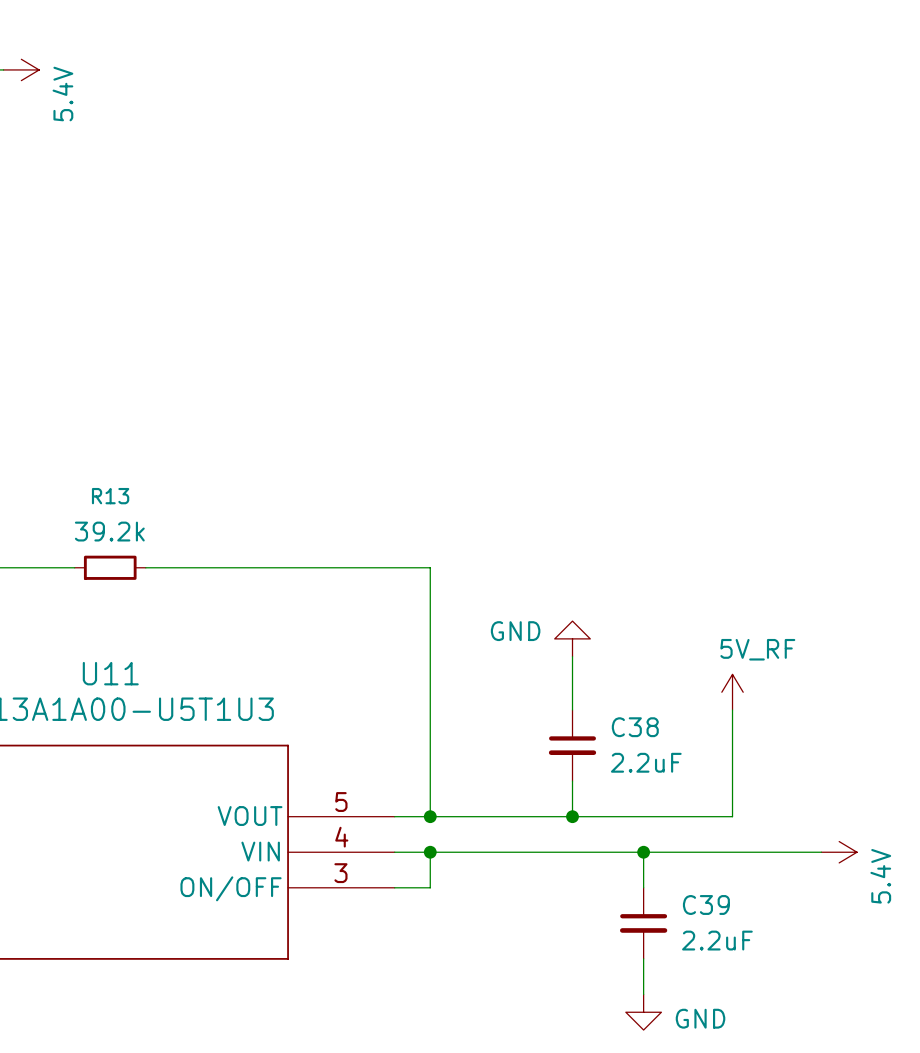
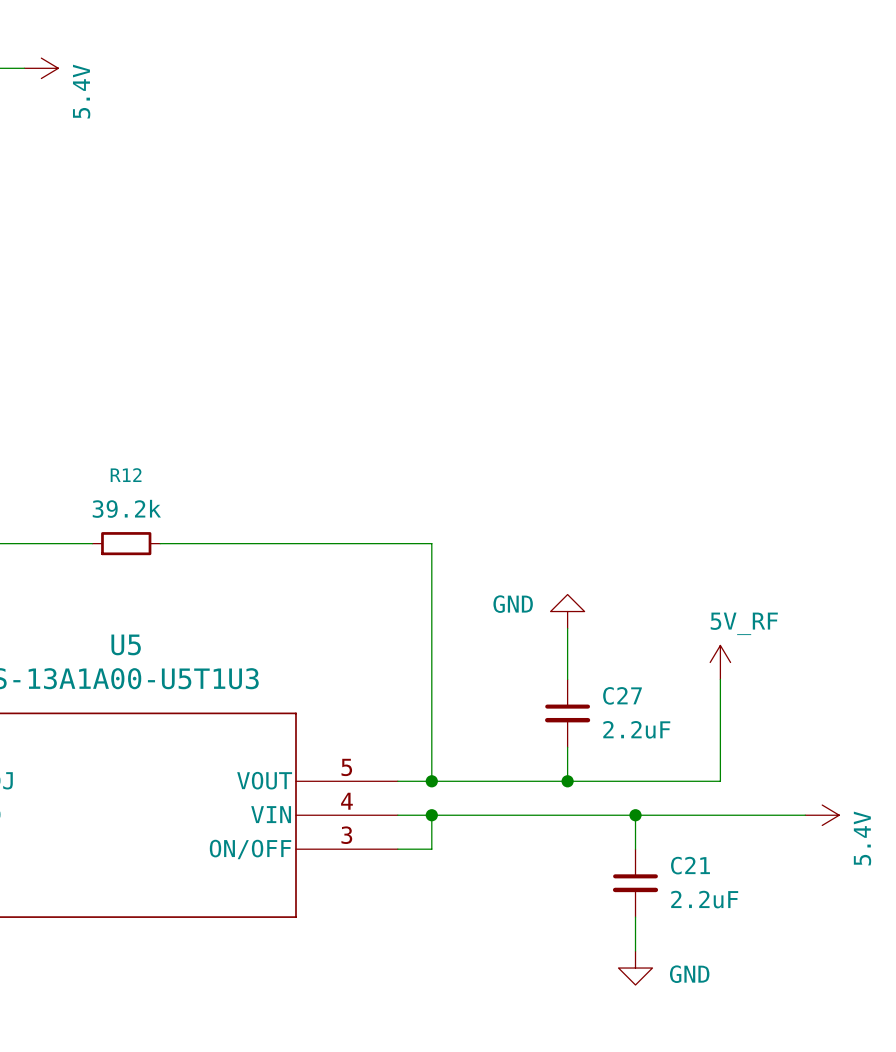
R13 name: R13 (110, 496) -> R12 (126, 475)
U11 name: U11 (110, 673) -> U5 (126, 644)
C38 name: C38 (635, 727) -> C27 (622, 695)
C39 name: C39 (706, 905) -> C21 (690, 865)

